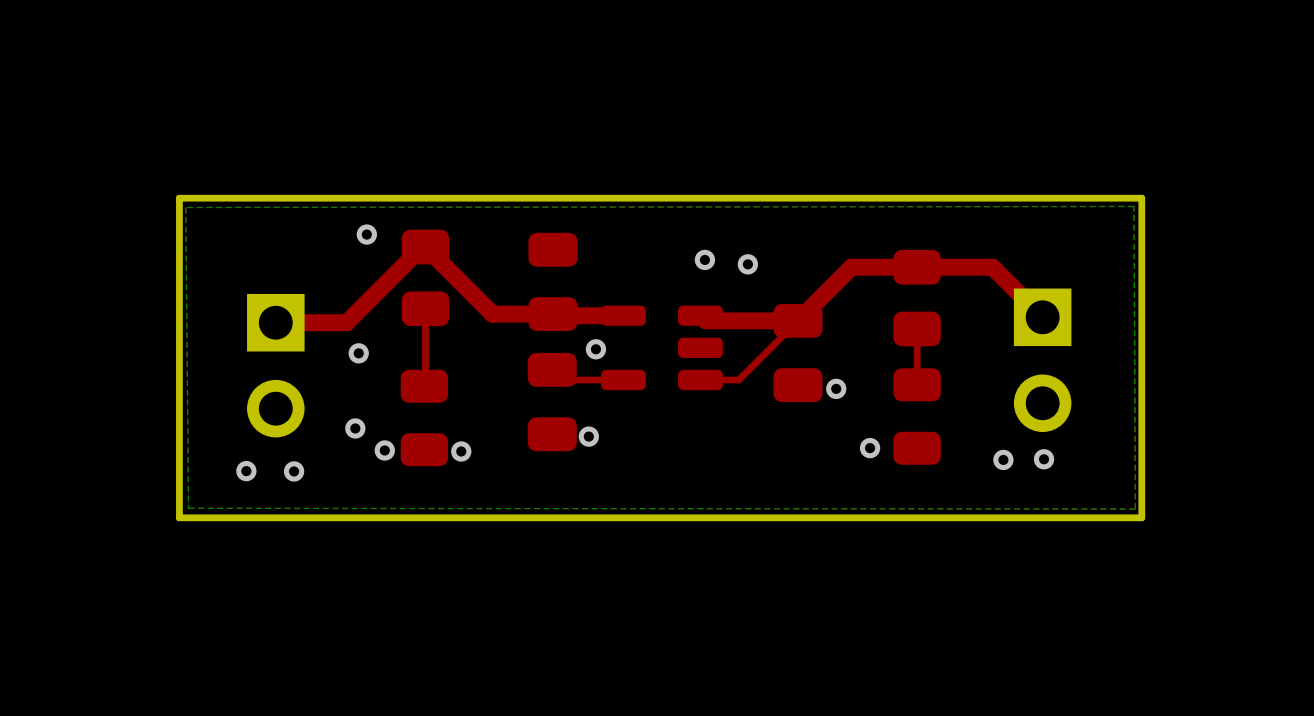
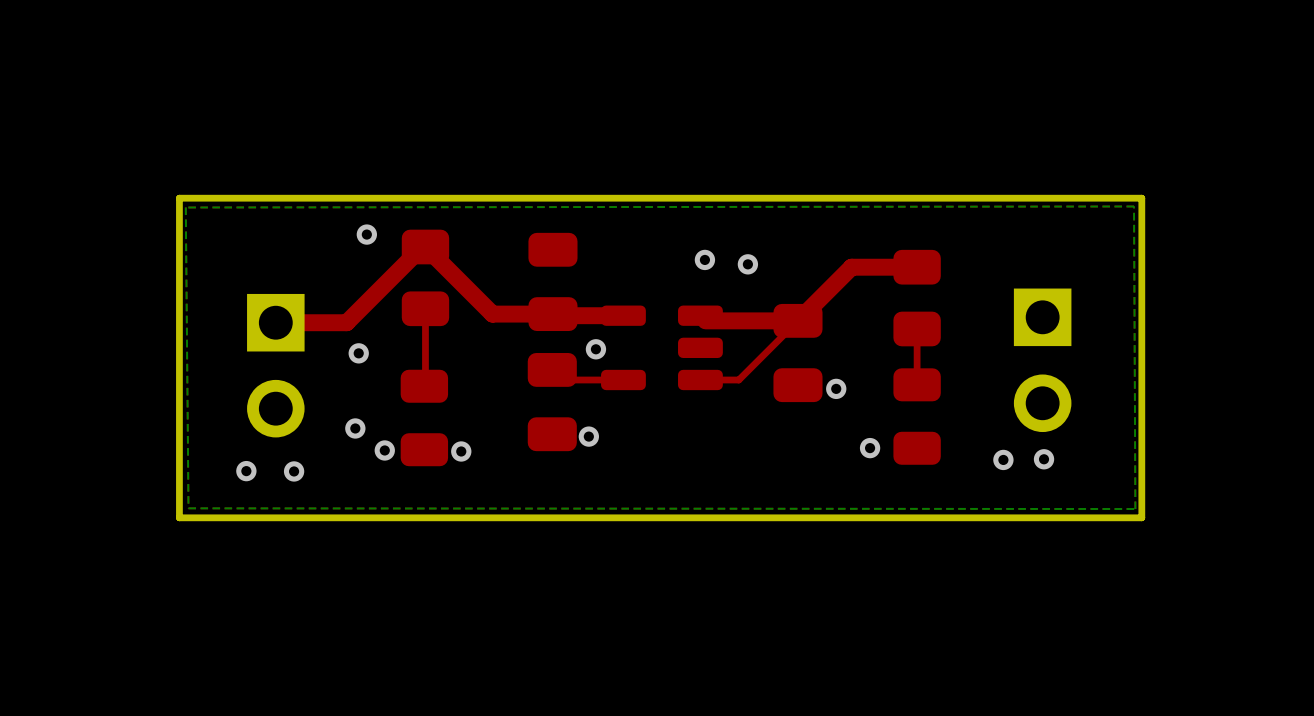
top track: (917, 267) (992, 267) (1042, 317) -> none

